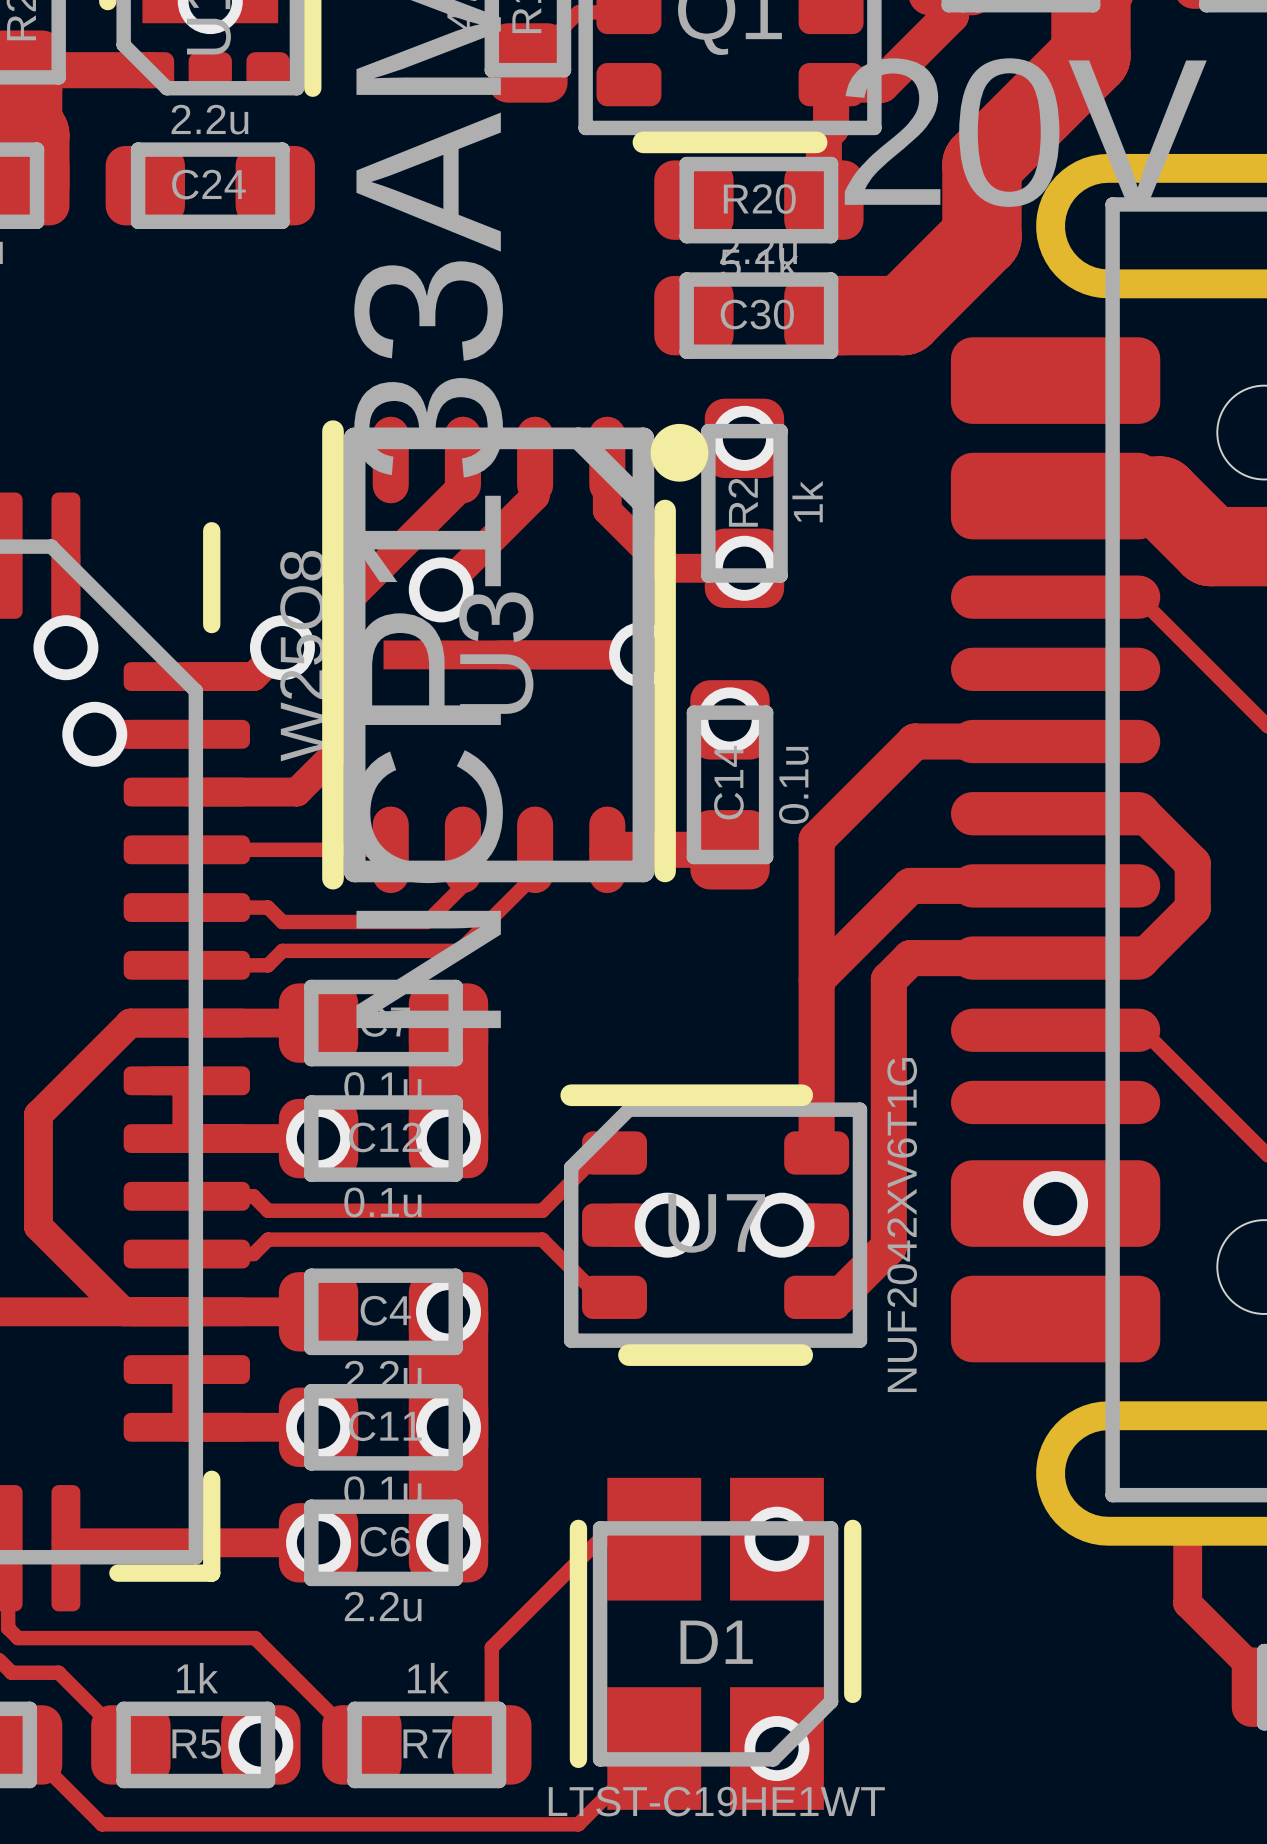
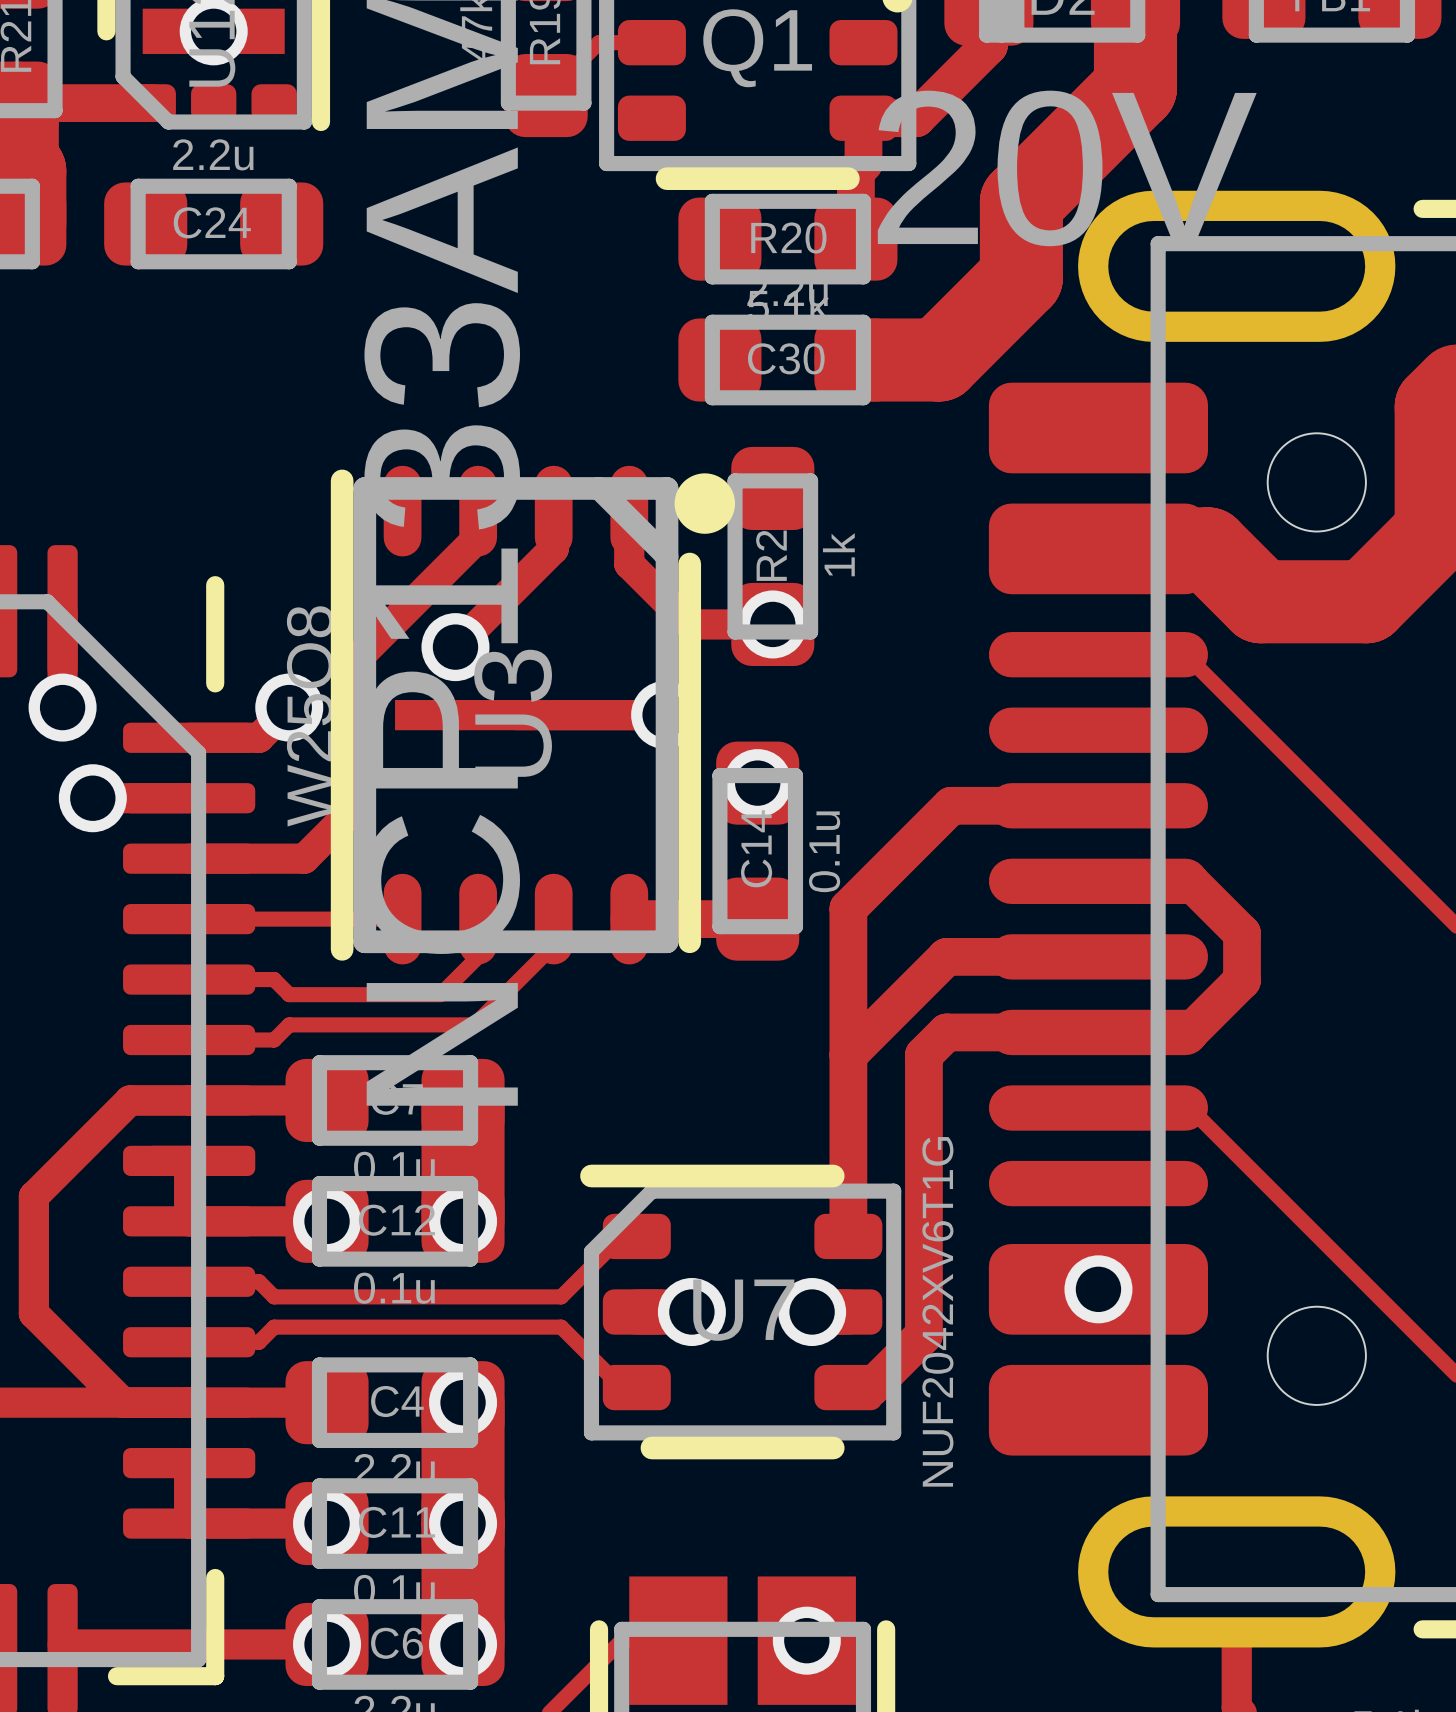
via: (744, 438) -> none

